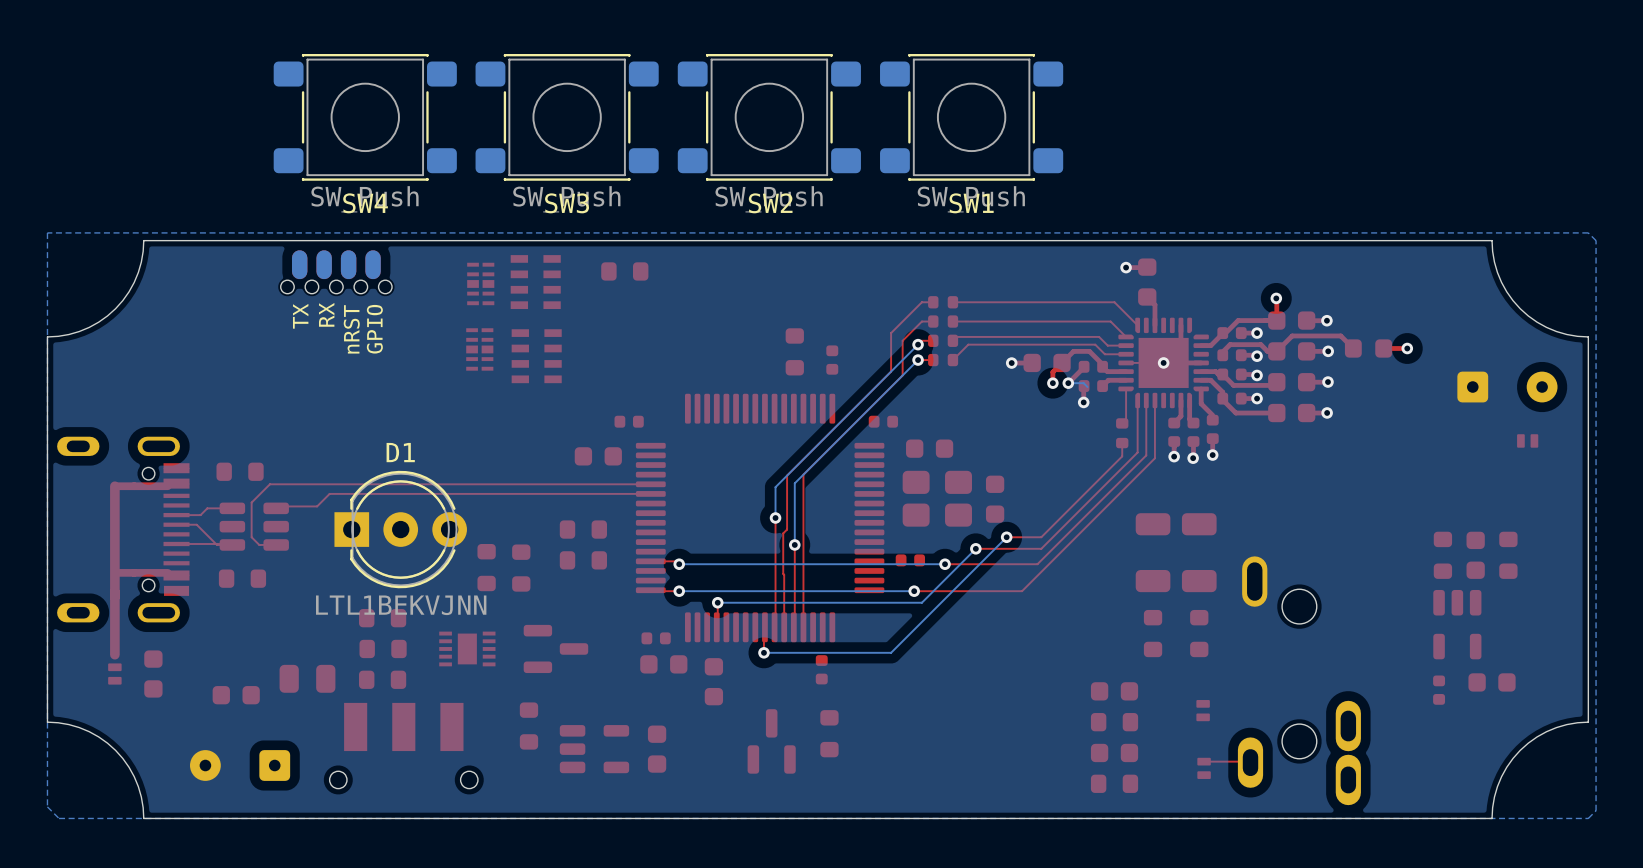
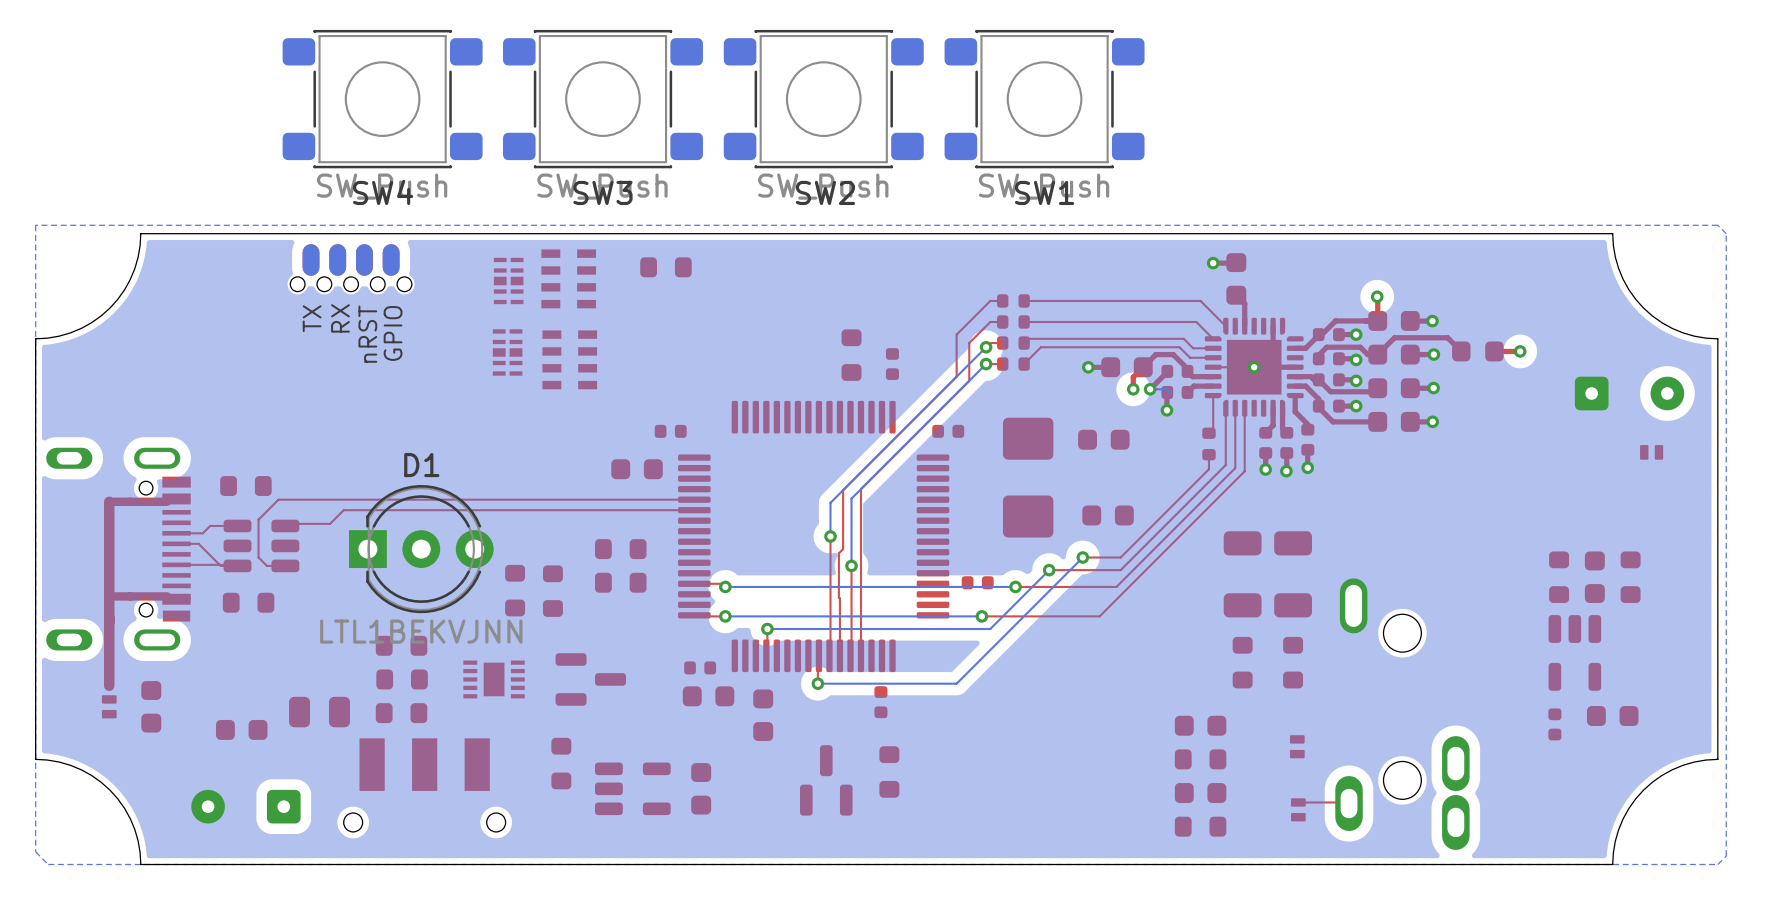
part: none -> (1103, 439)
part: (929, 448) -> none
part: none -> (1028, 477)
part: (937, 498) -> none
part rotation: 0° (995, 499) -> 90° clockwise (1108, 515)
part position: (995, 499) -> (1108, 515)

